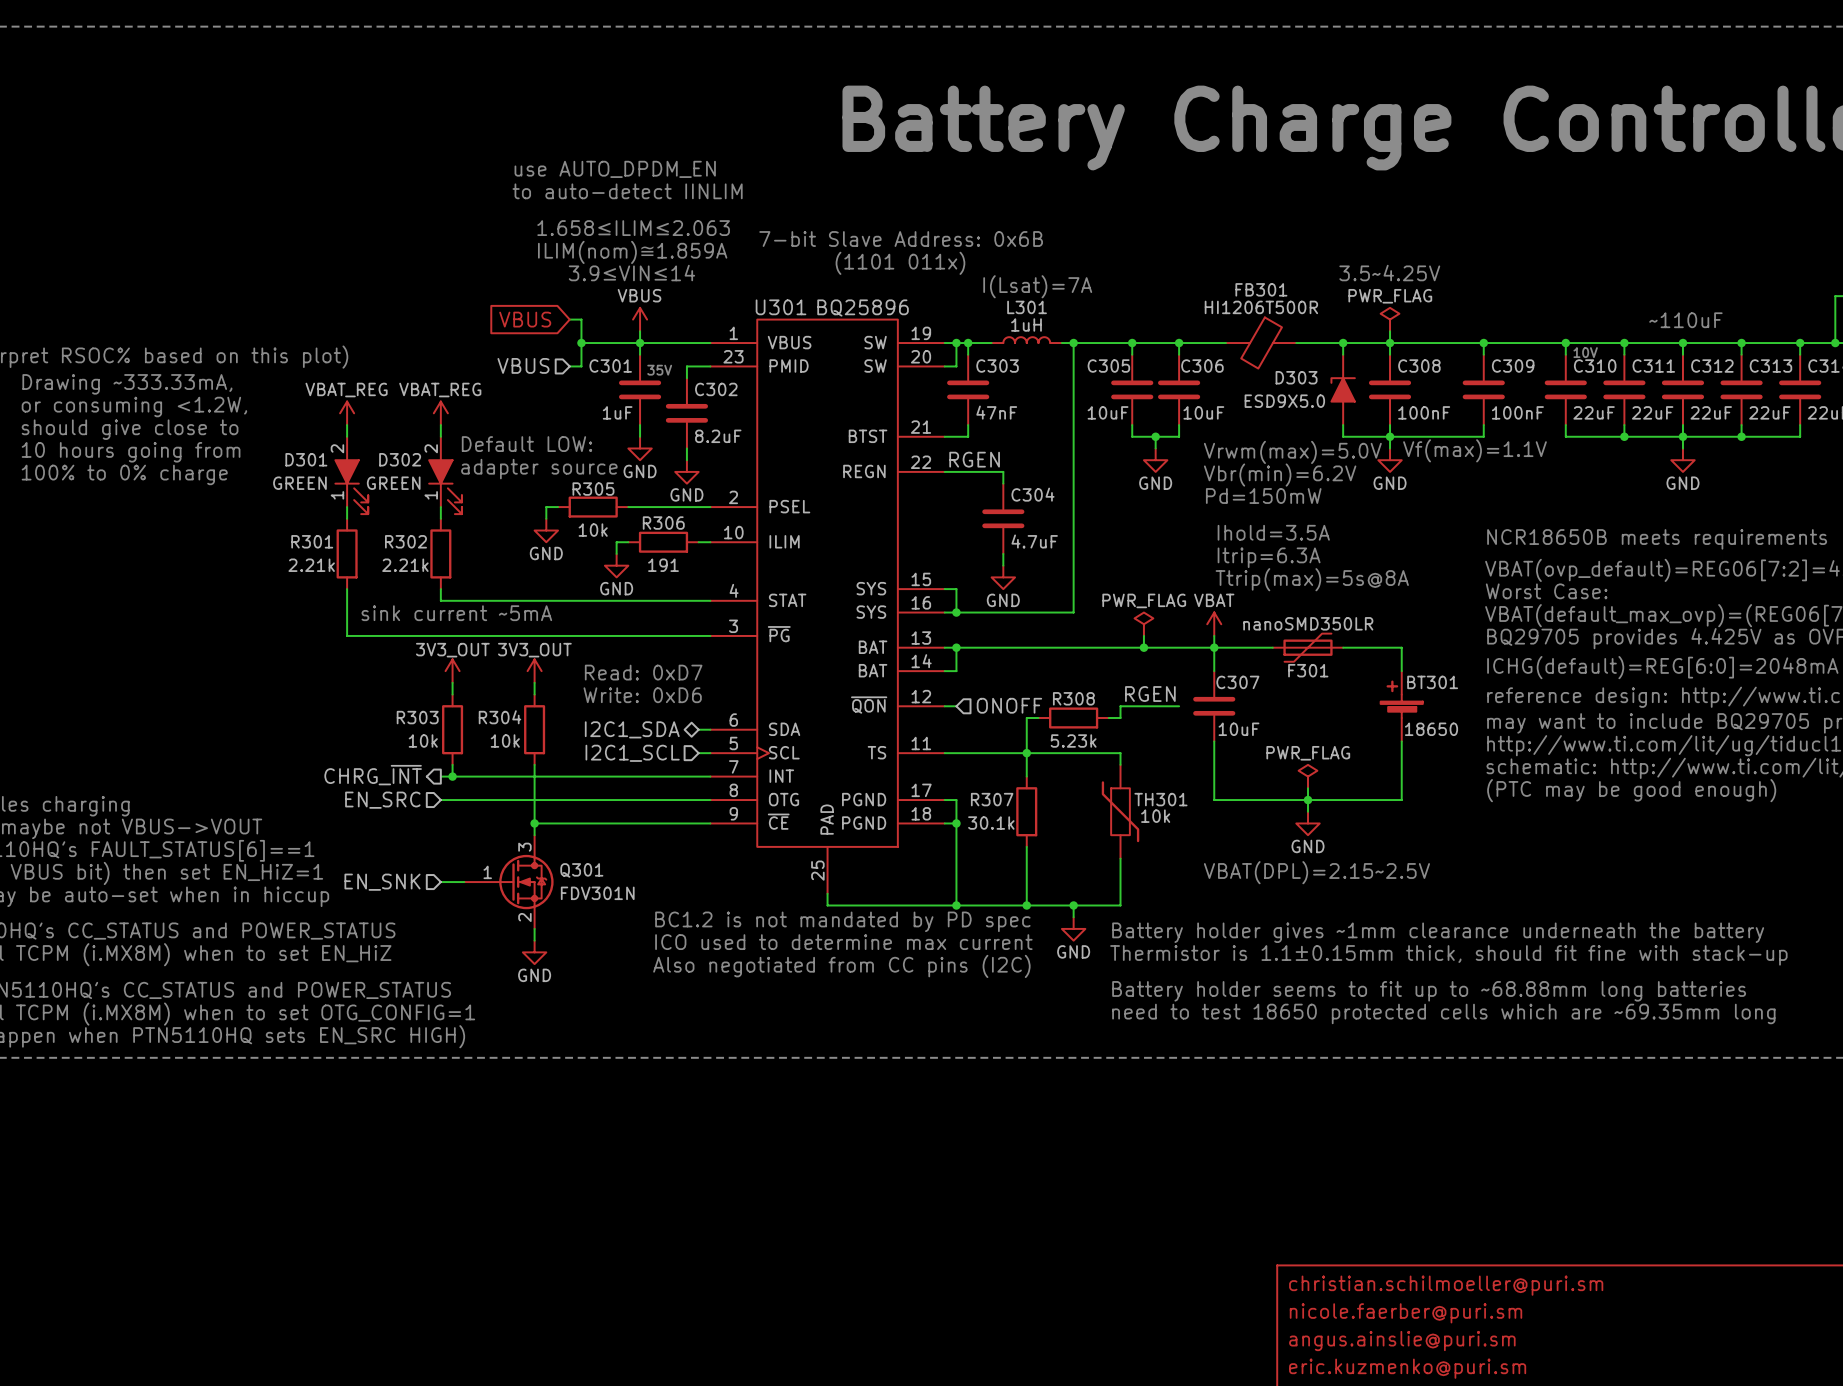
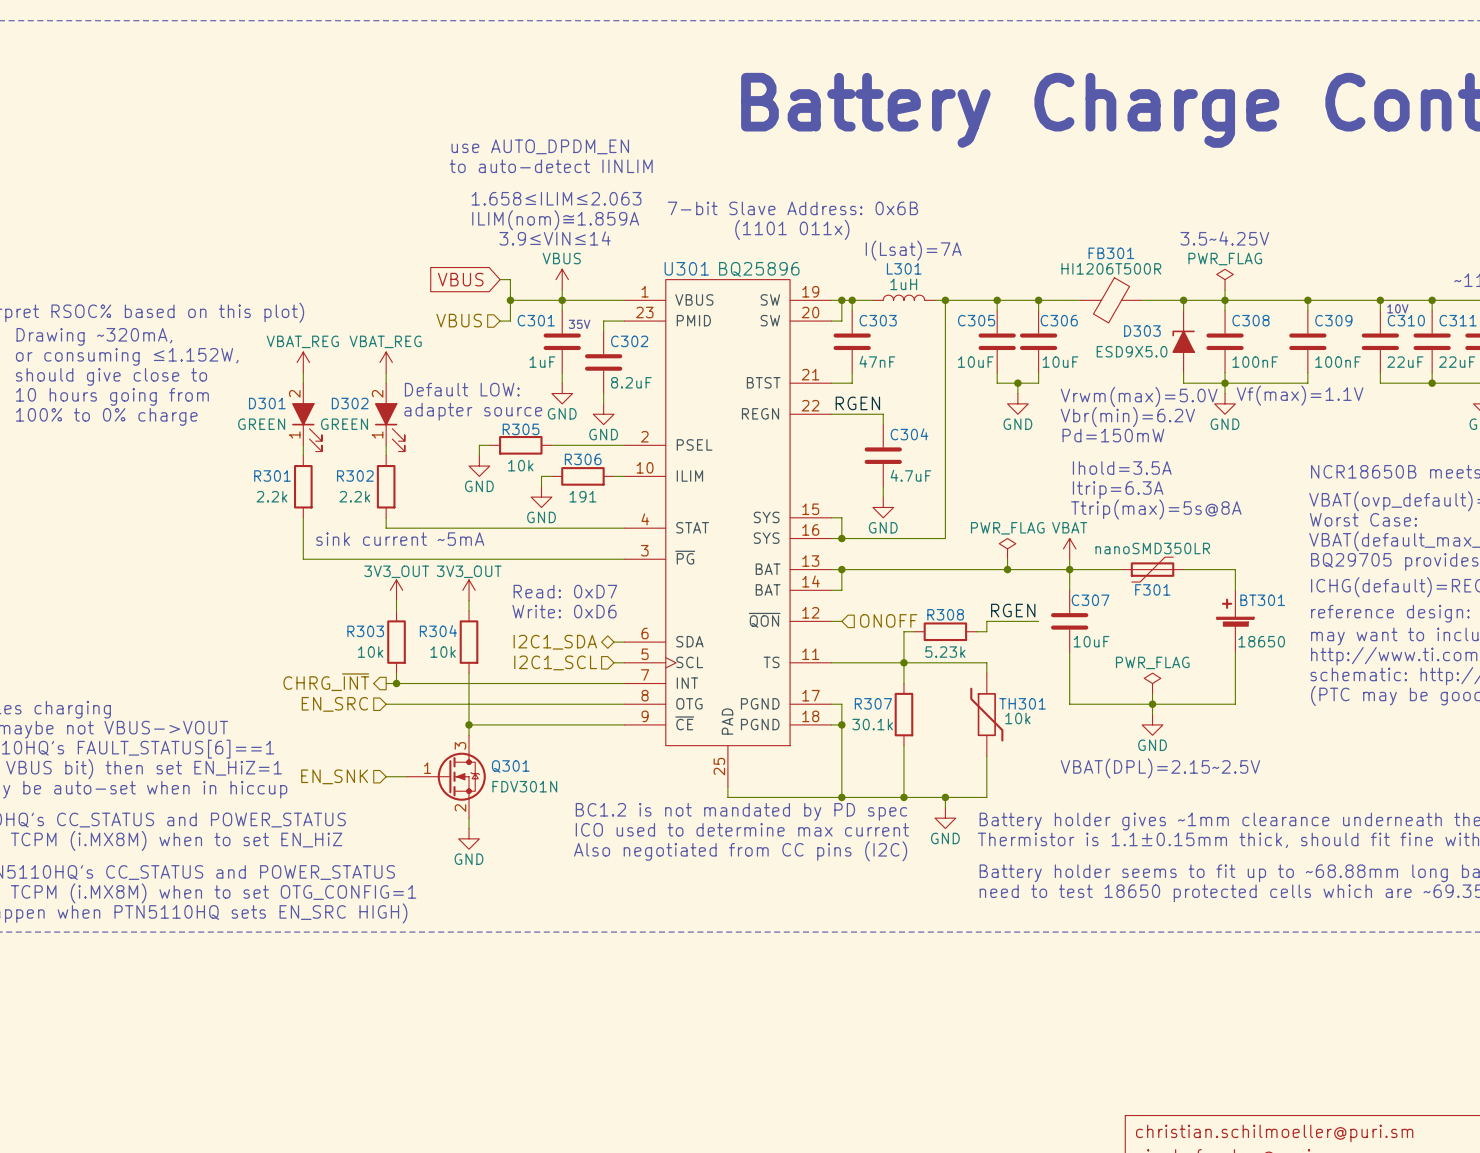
text: Drawing ~333.33mA, (127, 384) -> Drawing ~320mA, (94, 336)
text: or consuming <1.2W, (134, 407) -> or consuming ≤1.152W, (127, 356)
R301 value: 2.21k (311, 565) -> 2.2k (271, 496)
R302 value: 2.21k (405, 565) -> 2.2k (354, 496)

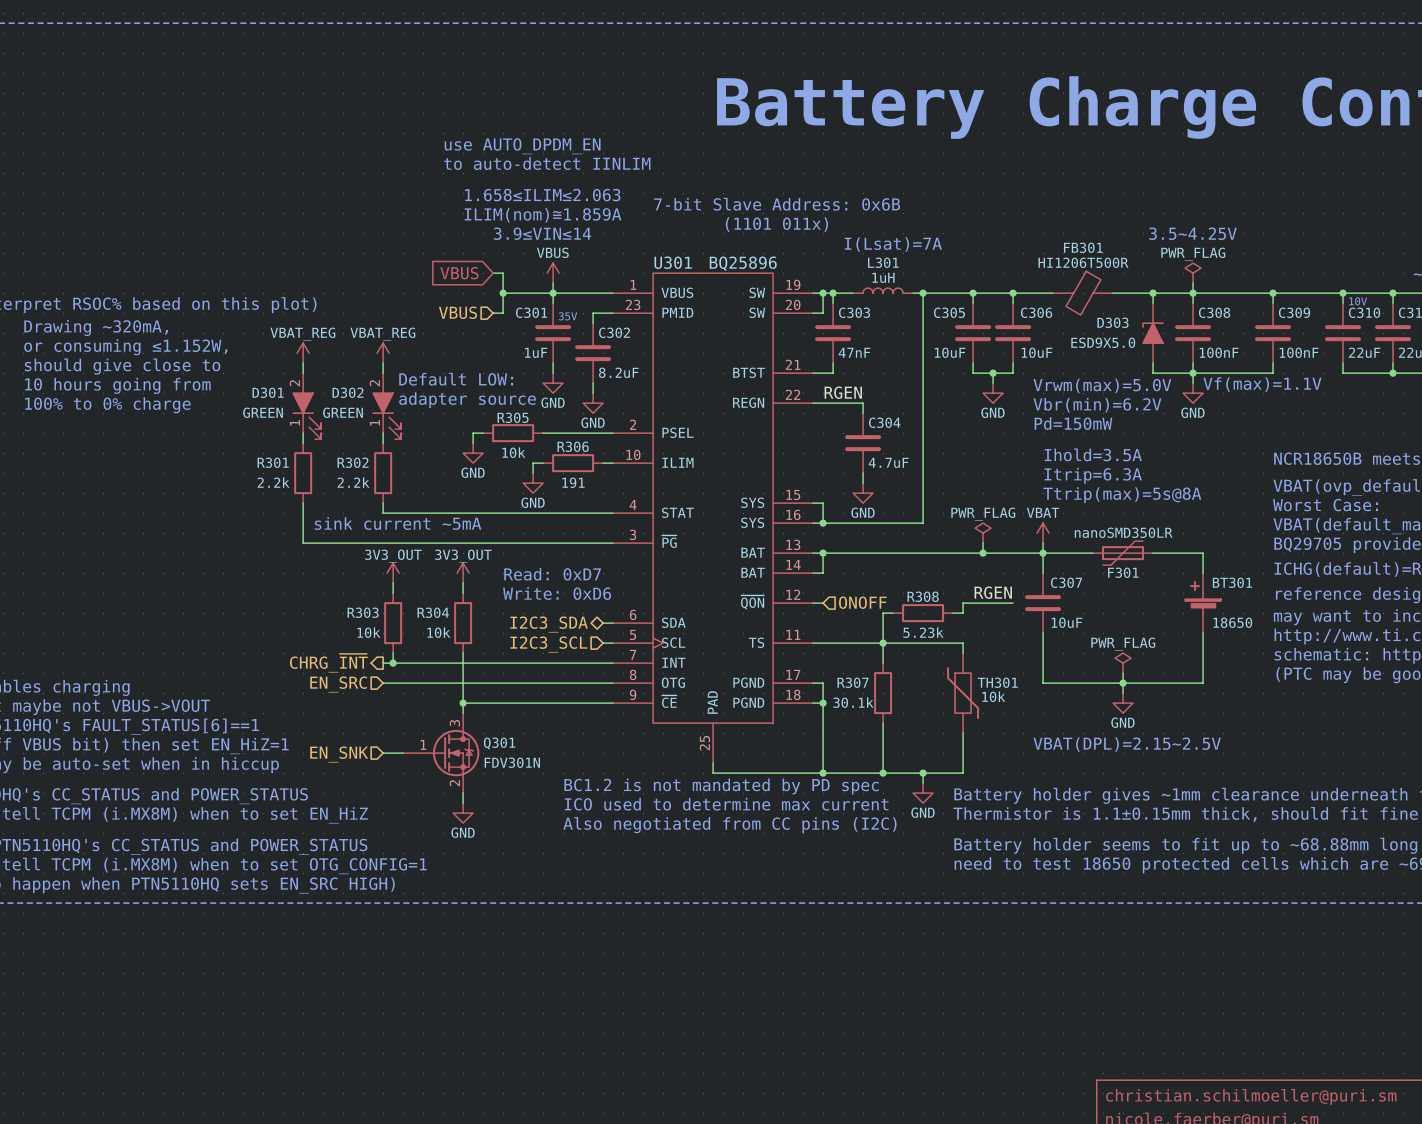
hierarchical label: I2C1_SDA (555, 642) -> I2C3_SDA (549, 624)
hierarchical label: I2C1_SCL (555, 662) -> I2C3_SCL (548, 644)

